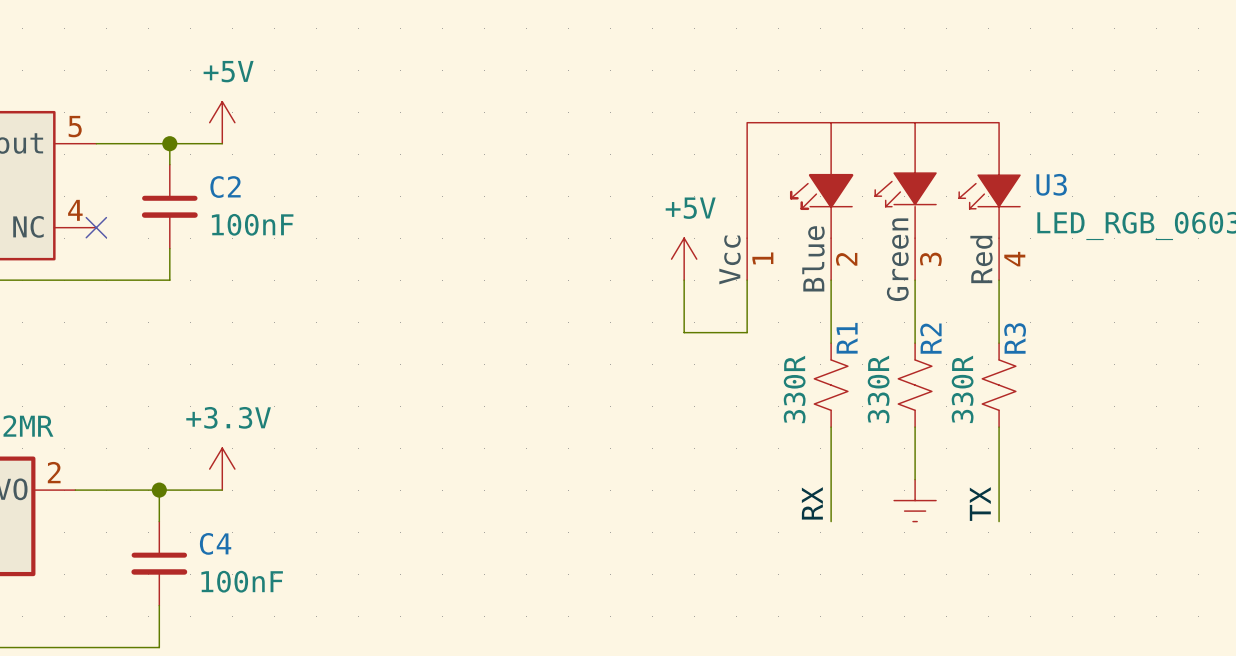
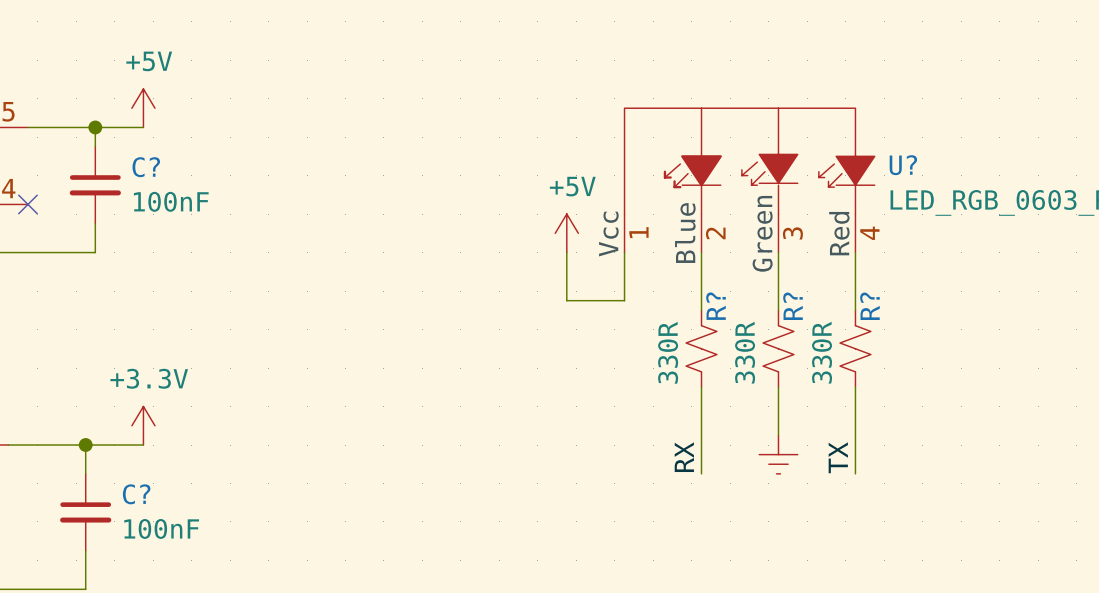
U3 name: U3 (1051, 184) -> U? (903, 165)
C2 name: C2 (225, 187) -> C? (146, 167)
R1 name: R1 (847, 338) -> R? (716, 306)
R2 name: R2 (930, 338) -> R? (792, 306)
R3 name: R3 (1015, 338) -> R? (869, 306)
C4 name: C4 (215, 543) -> C? (136, 494)

